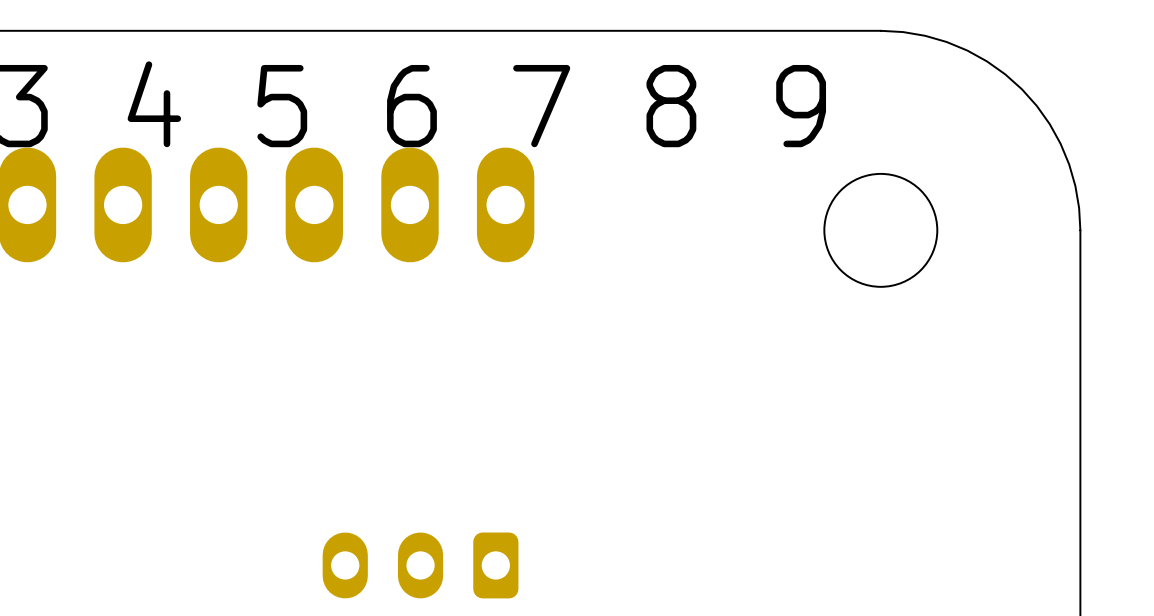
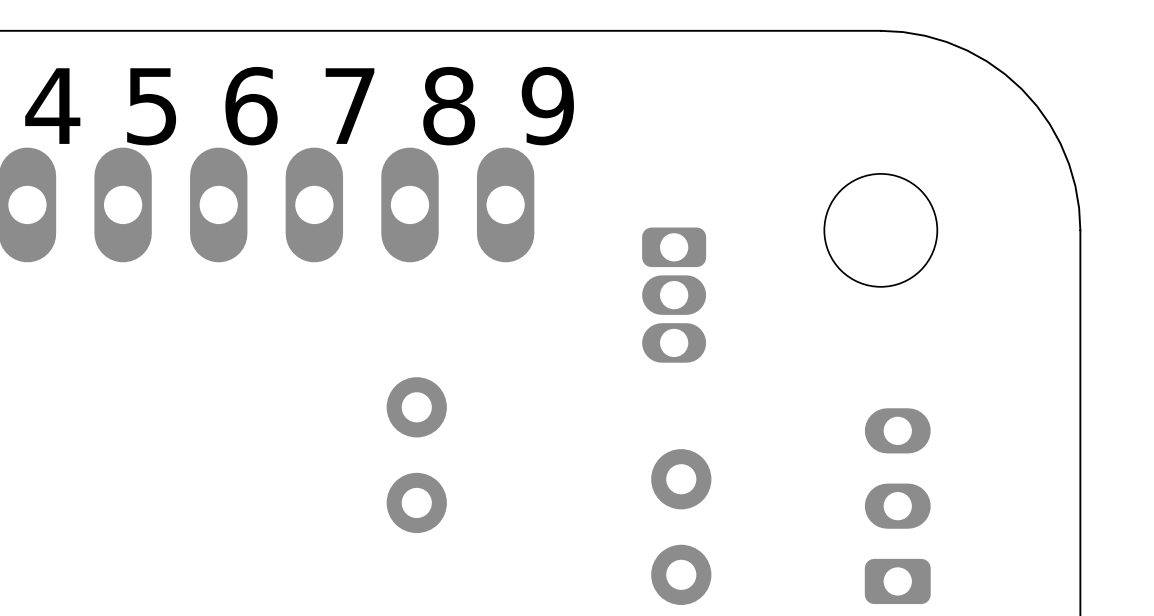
part: none -> (674, 295)
part: none -> (416, 455)
part: none -> (681, 527)
part rotation: 0° (420, 565) -> 90° clockwise (897, 506)
part position: (420, 565) -> (897, 506)

